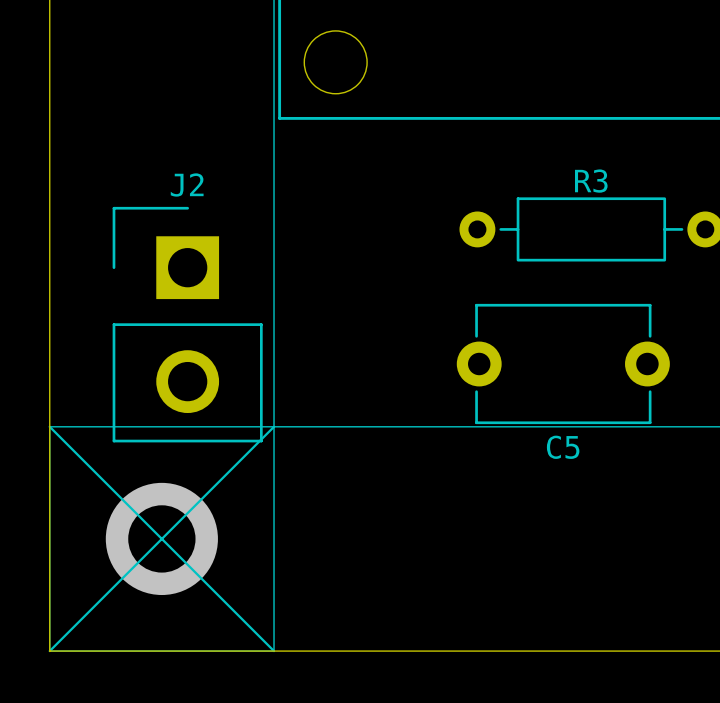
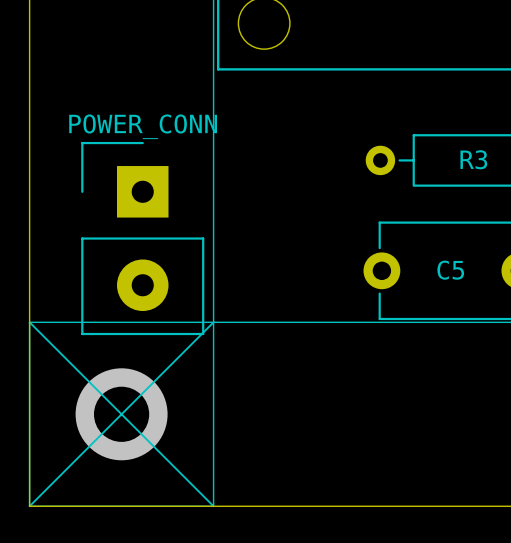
R3 name position: R3 (591, 181) -> R3 (473, 159)
J2: (187, 324) -> none
POWER_CONN: none -> (142, 238)
C5 name position: C5 (563, 447) -> C5 (450, 270)

